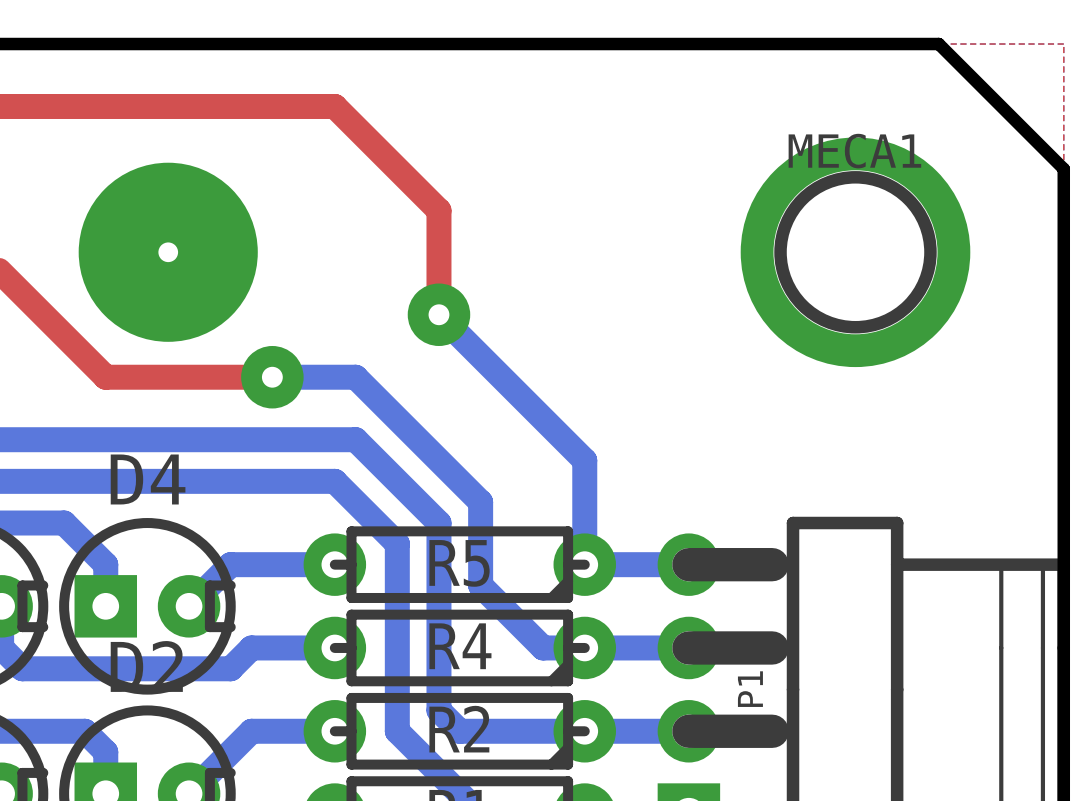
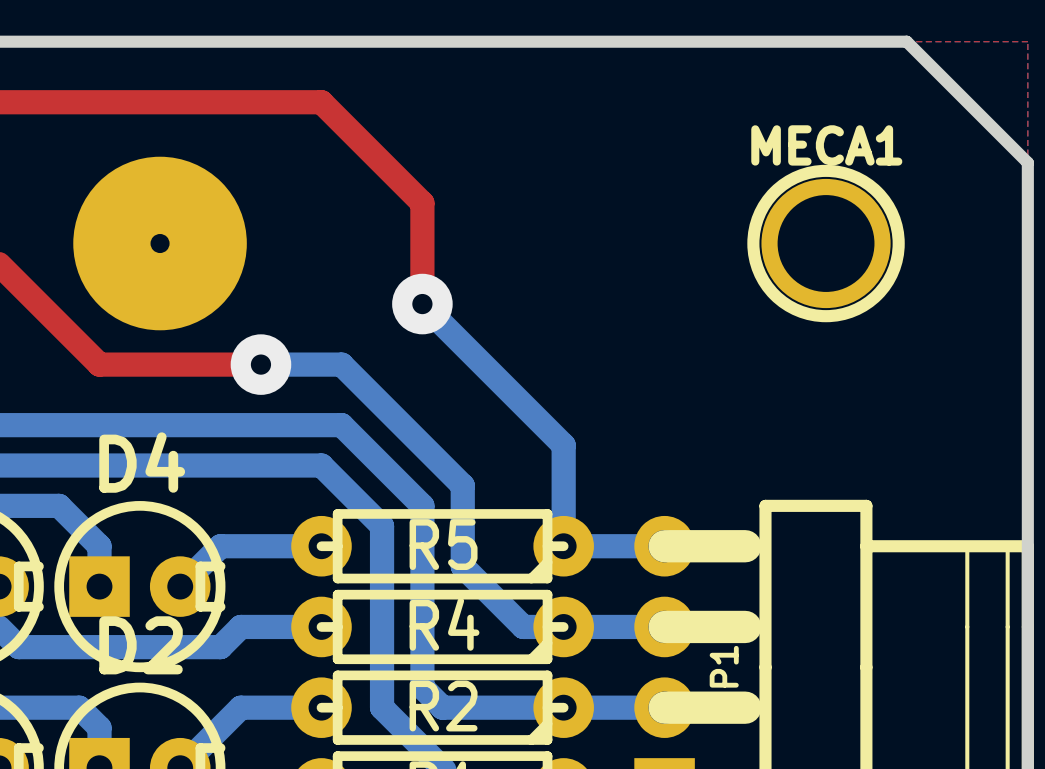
MECA1 footprint: [740, 137, 971, 368] -> [747, 164, 905, 323]

